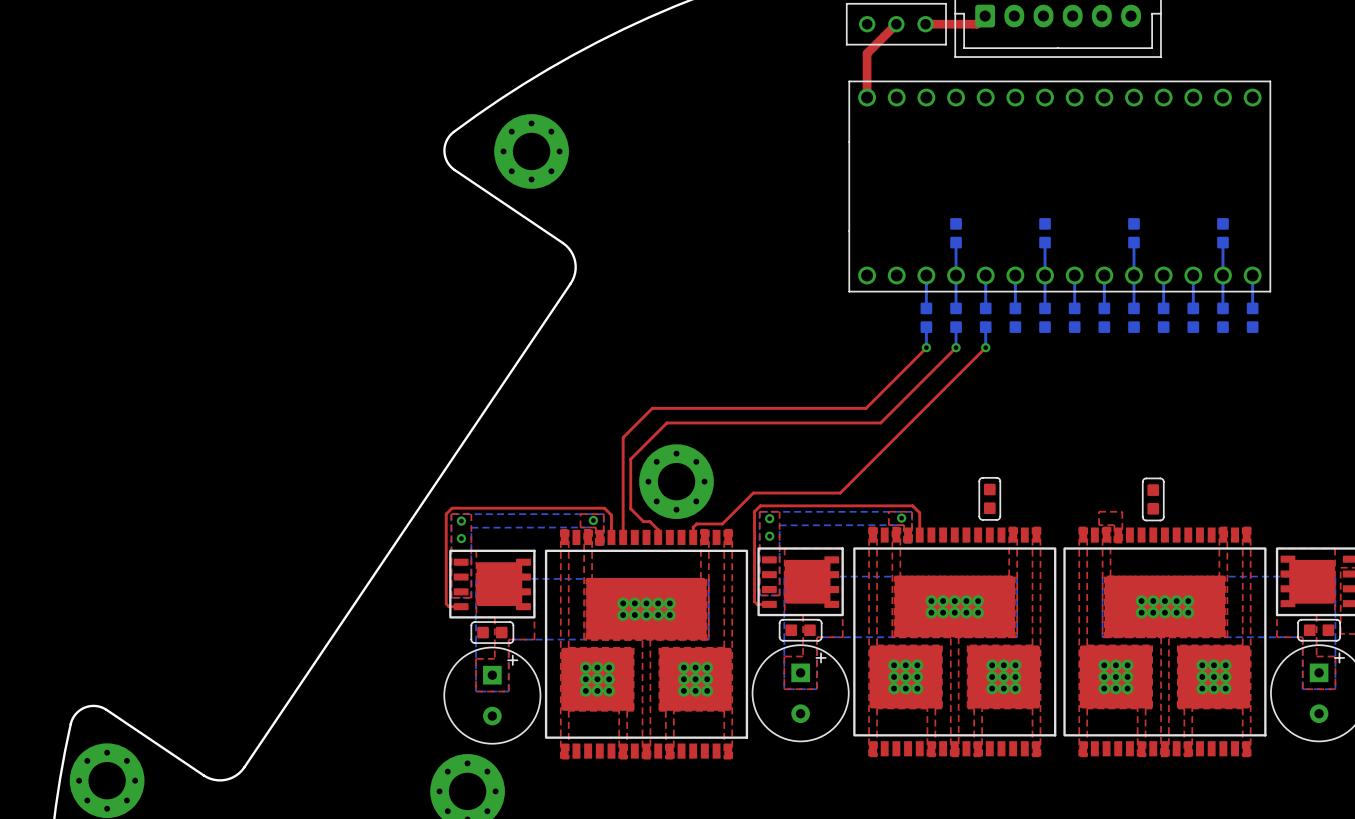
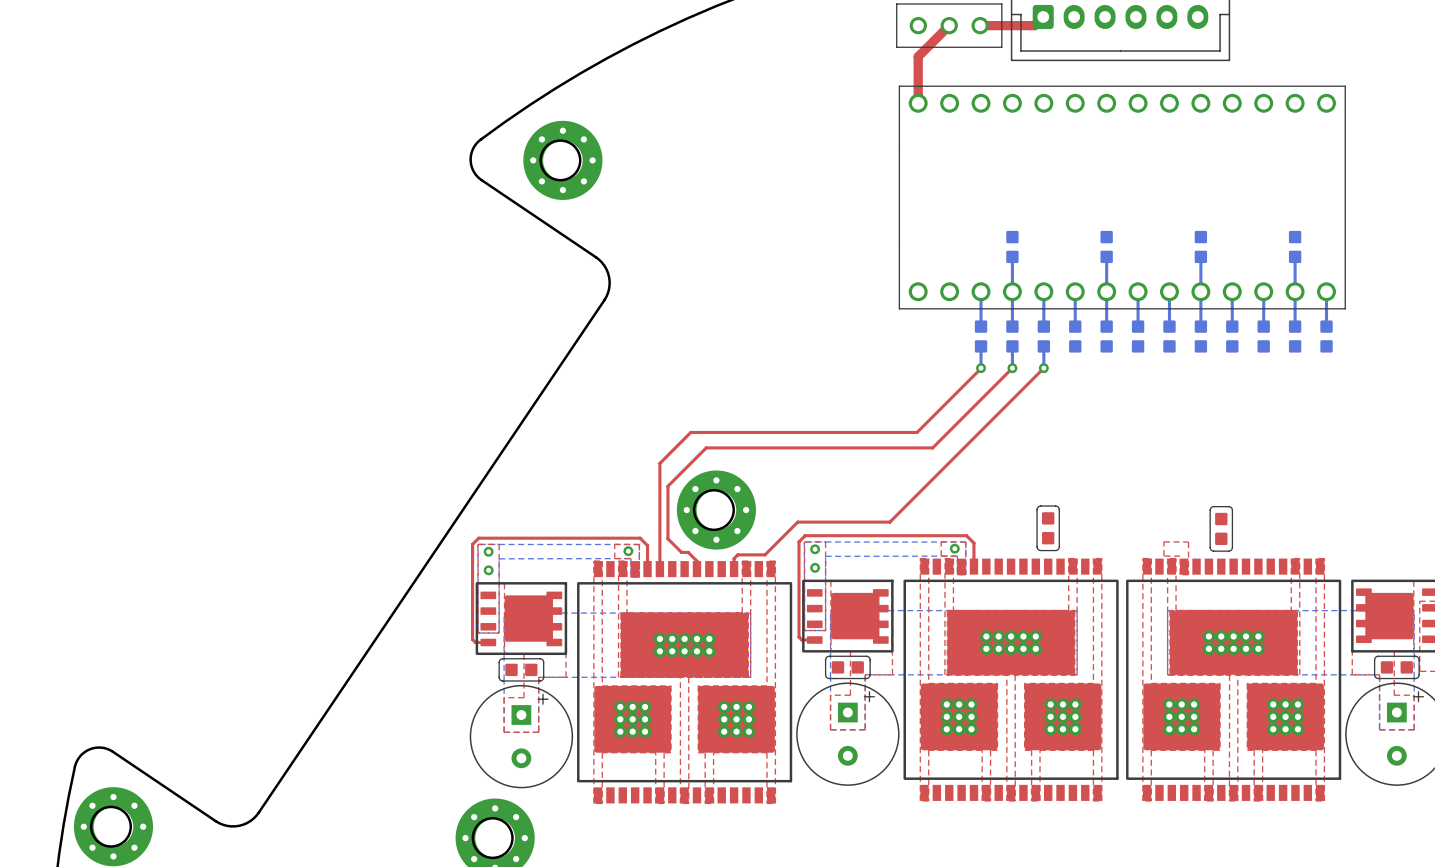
round board edge: none -> [539, 139, 582, 182]
round board edge: none -> [692, 489, 735, 532]
round board edge: none -> [89, 805, 133, 848]
round board edge: none -> [471, 817, 514, 860]

